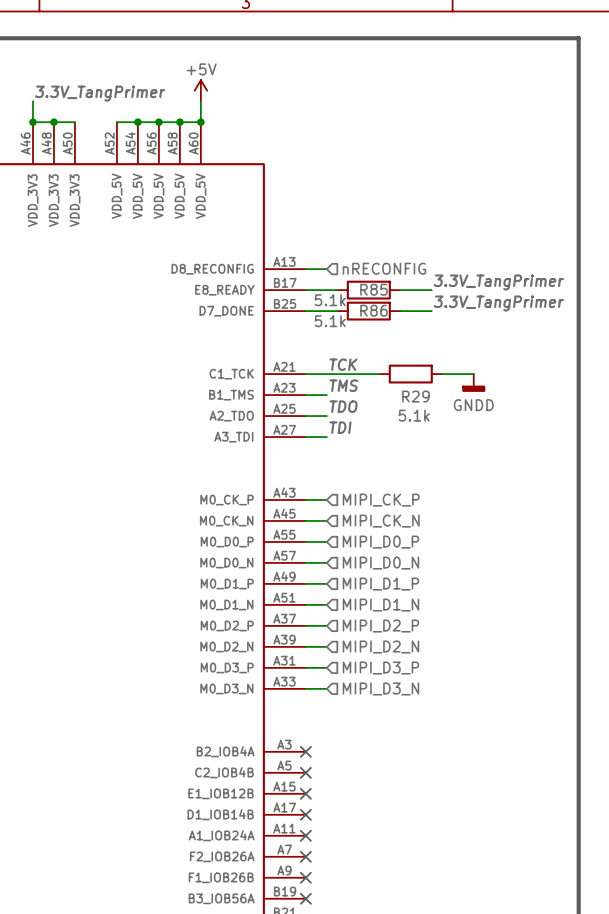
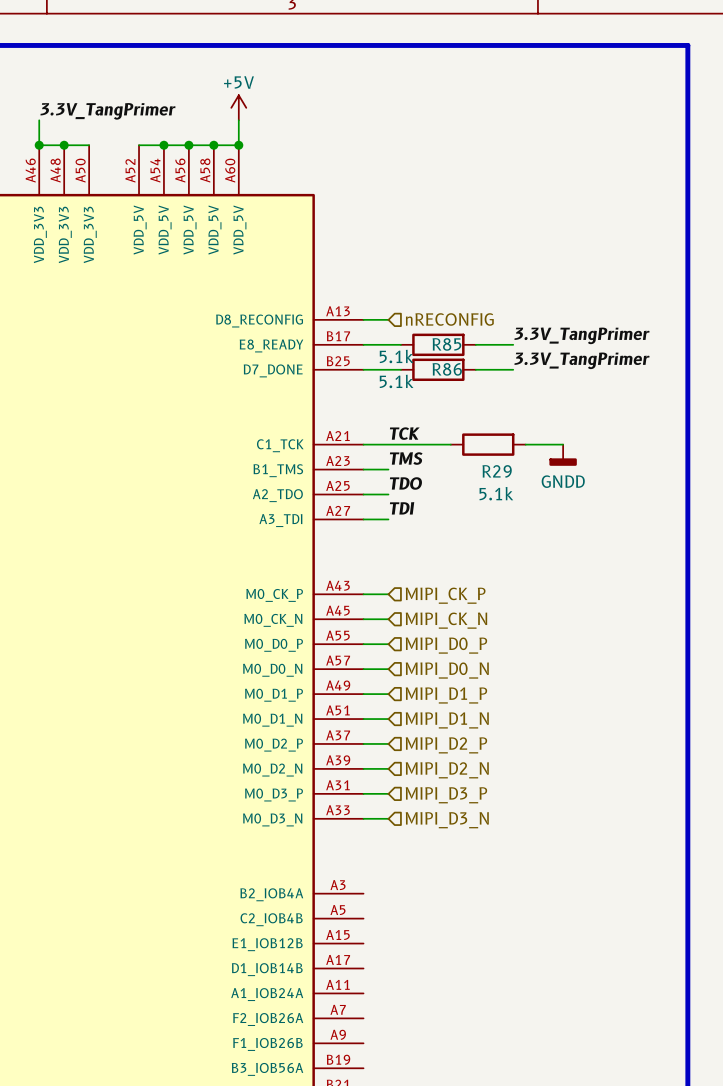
no-connect mark: (305, 751) -> none
no-connect mark: (305, 772) -> none
no-connect mark: (305, 793) -> none
no-connect mark: (305, 814) -> none
no-connect mark: (305, 835) -> none
no-connect mark: (305, 856) -> none
no-connect mark: (305, 877) -> none
no-connect mark: (305, 898) -> none

